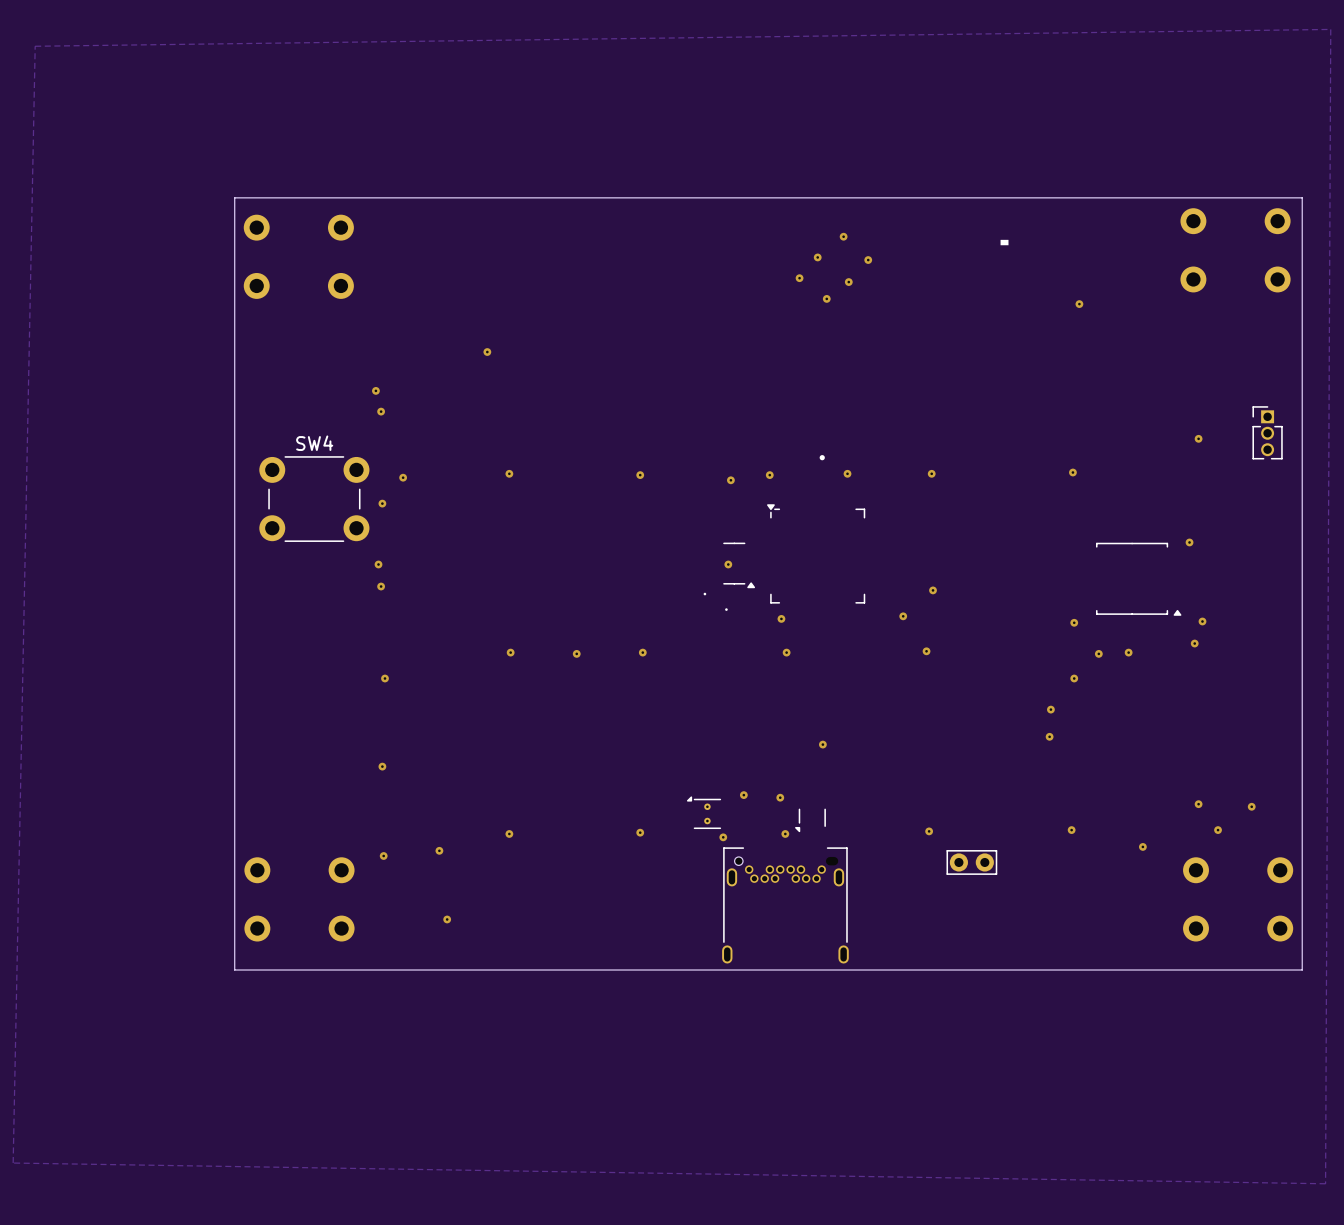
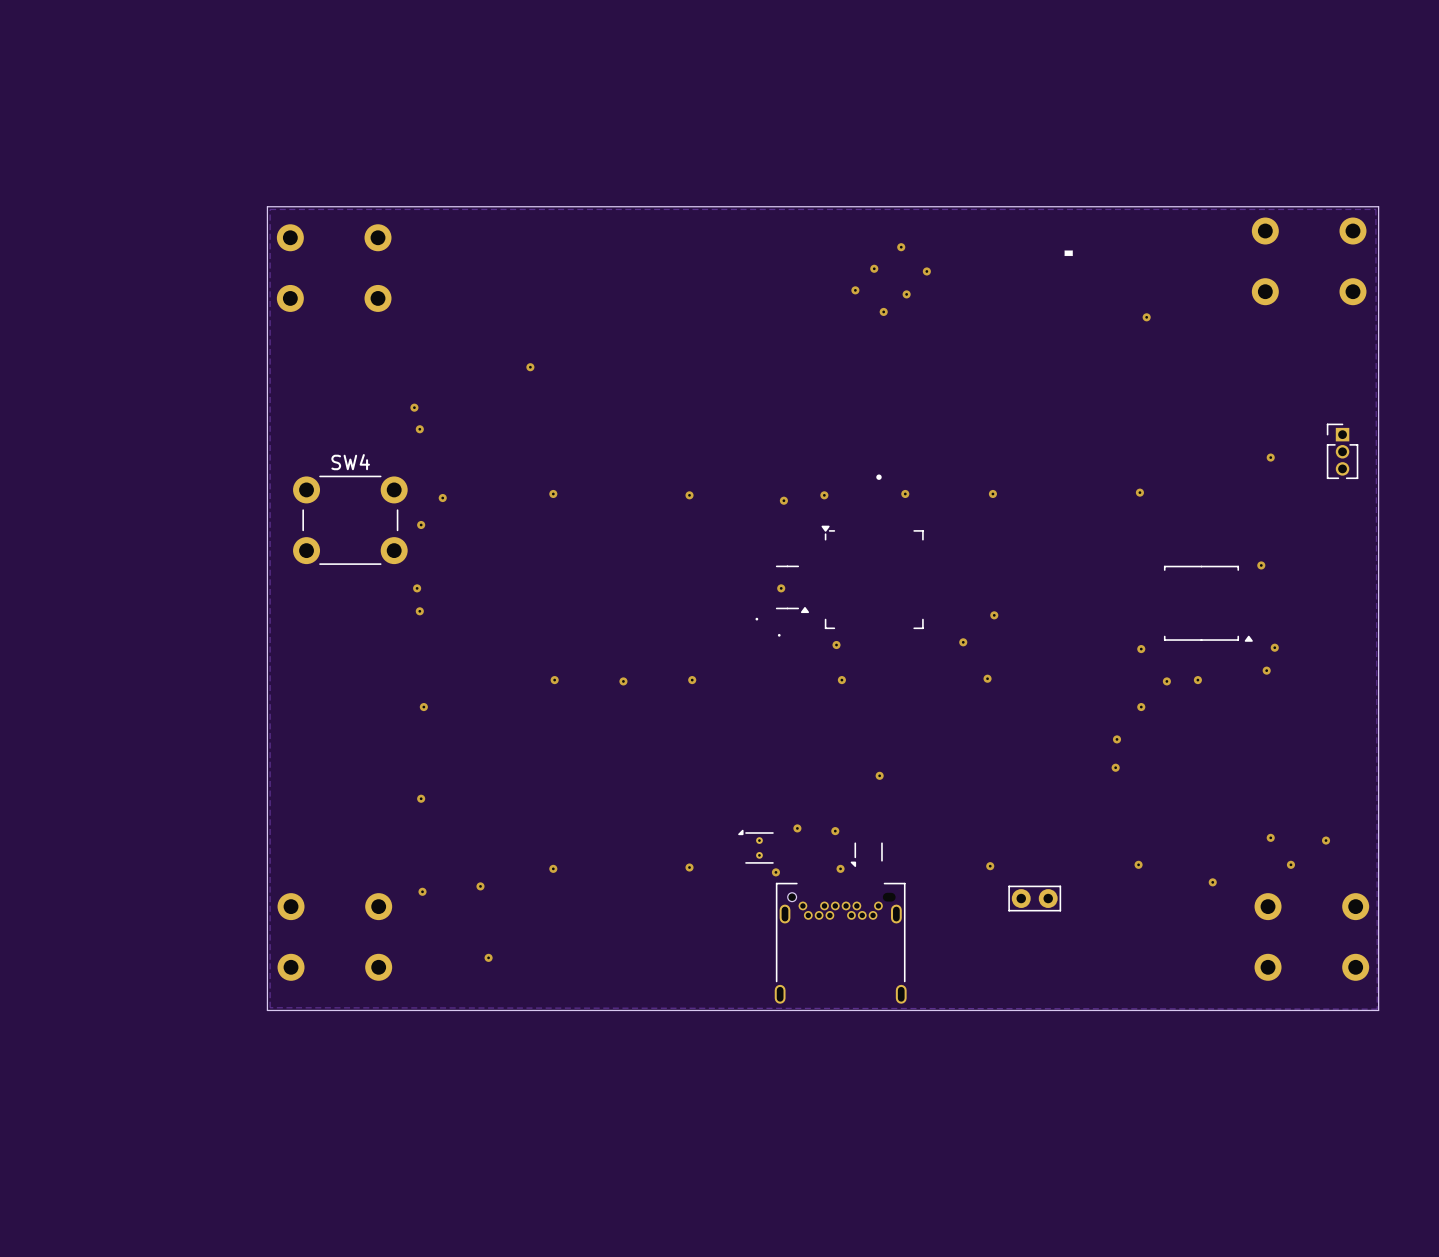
zone outline: (1330, 29) (35, 46) (13, 1163) (1325, 1183) (1330, 29) -> (270, 209) (270, 1007) (1377, 1009) (1375, 209) (270, 209)

